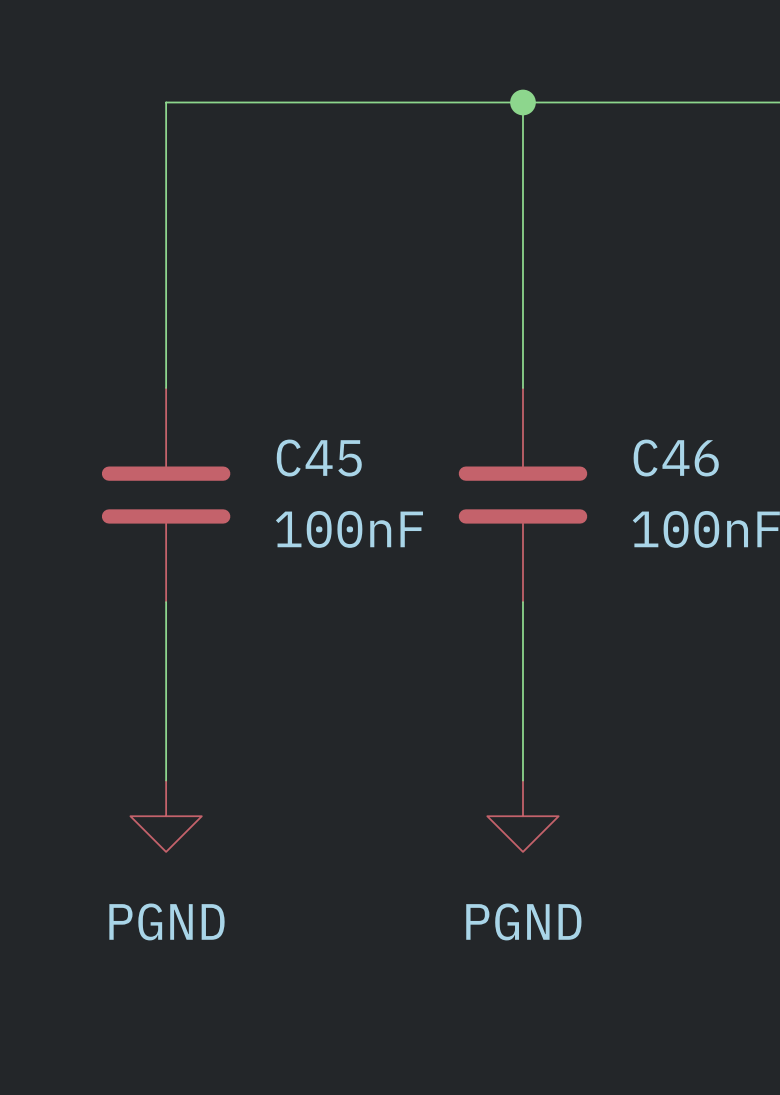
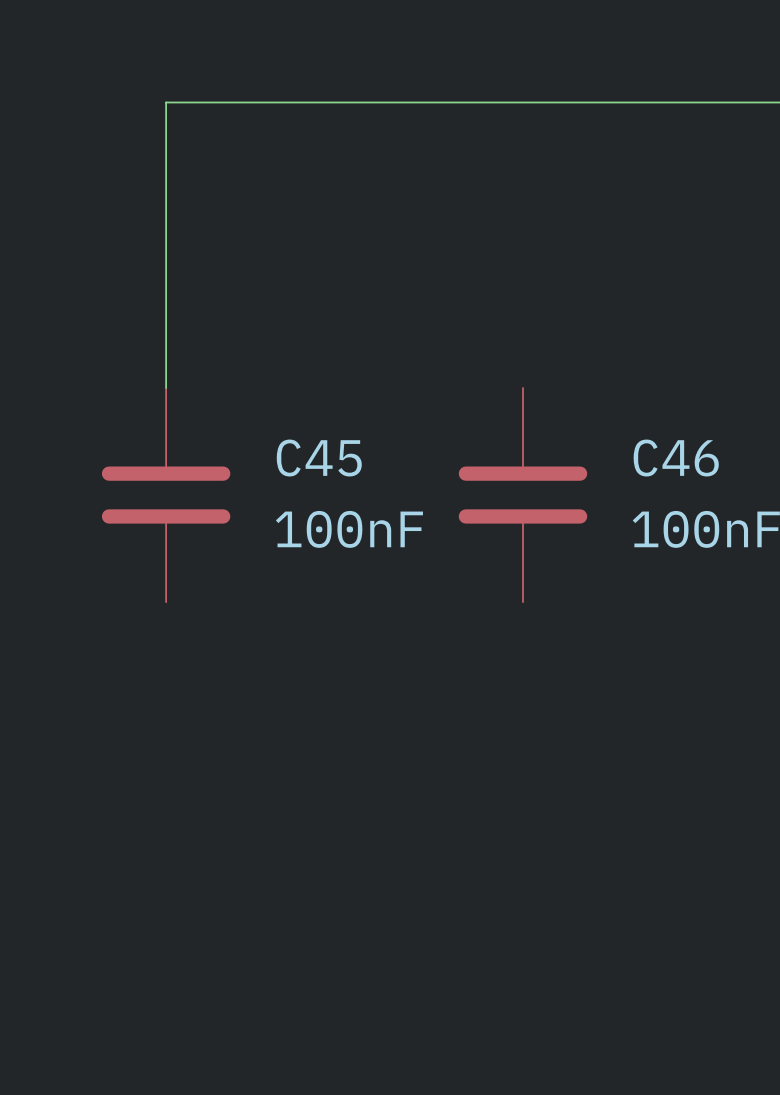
wire: (522, 102) (522, 387) -> none
junction: (522, 102) -> none
wire: (166, 602) (166, 780) -> none
wire: (522, 602) (522, 780) -> none
power symbol: PGND (166, 816) -> none
power symbol: PGND (522, 816) -> none

